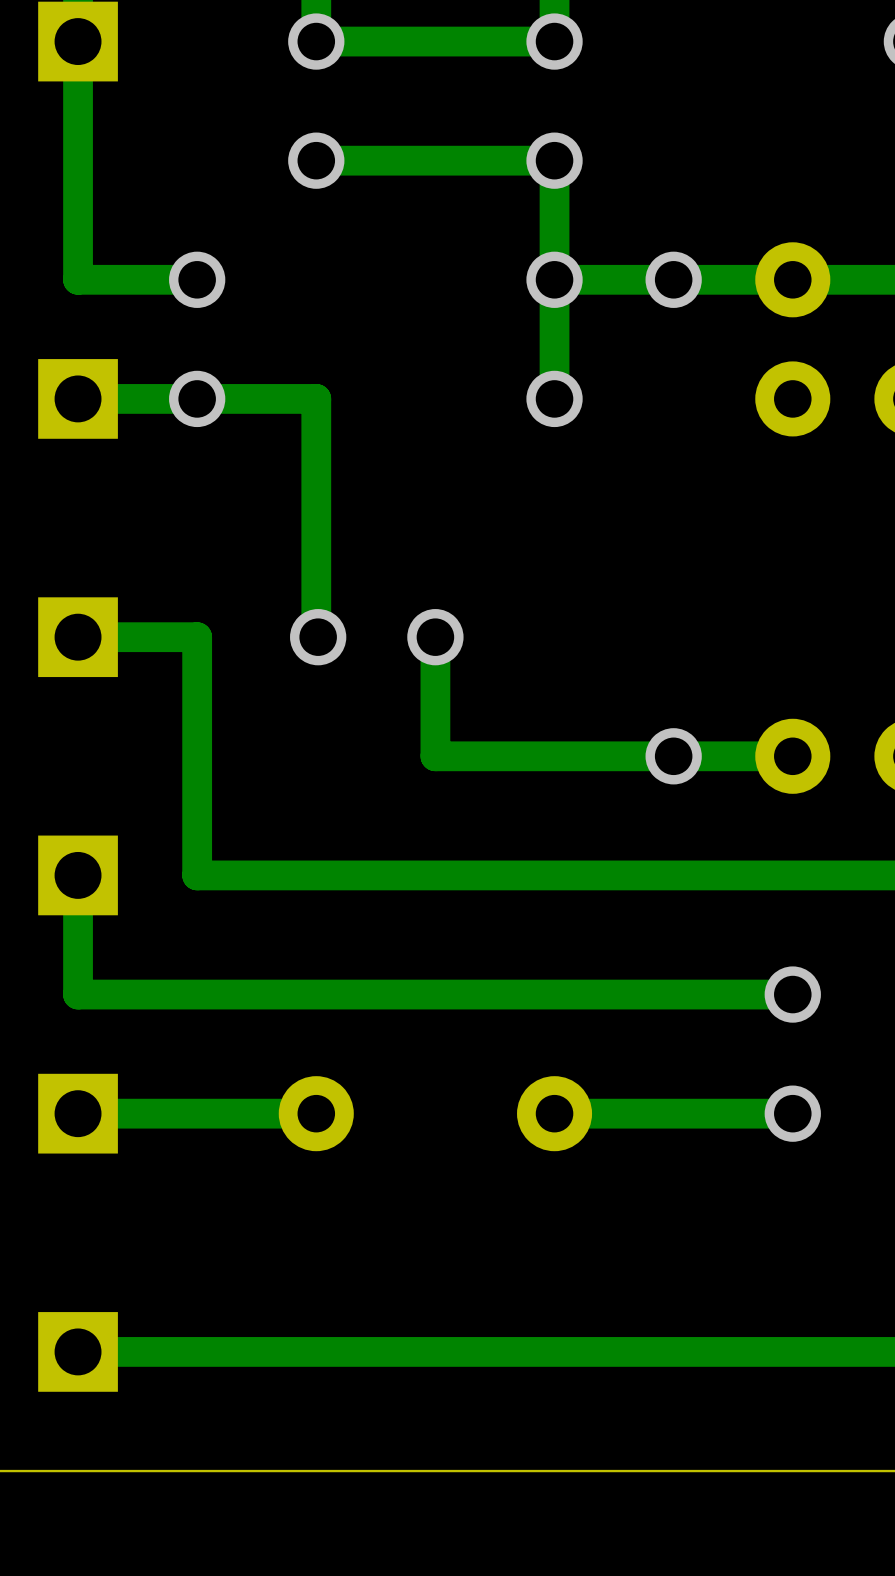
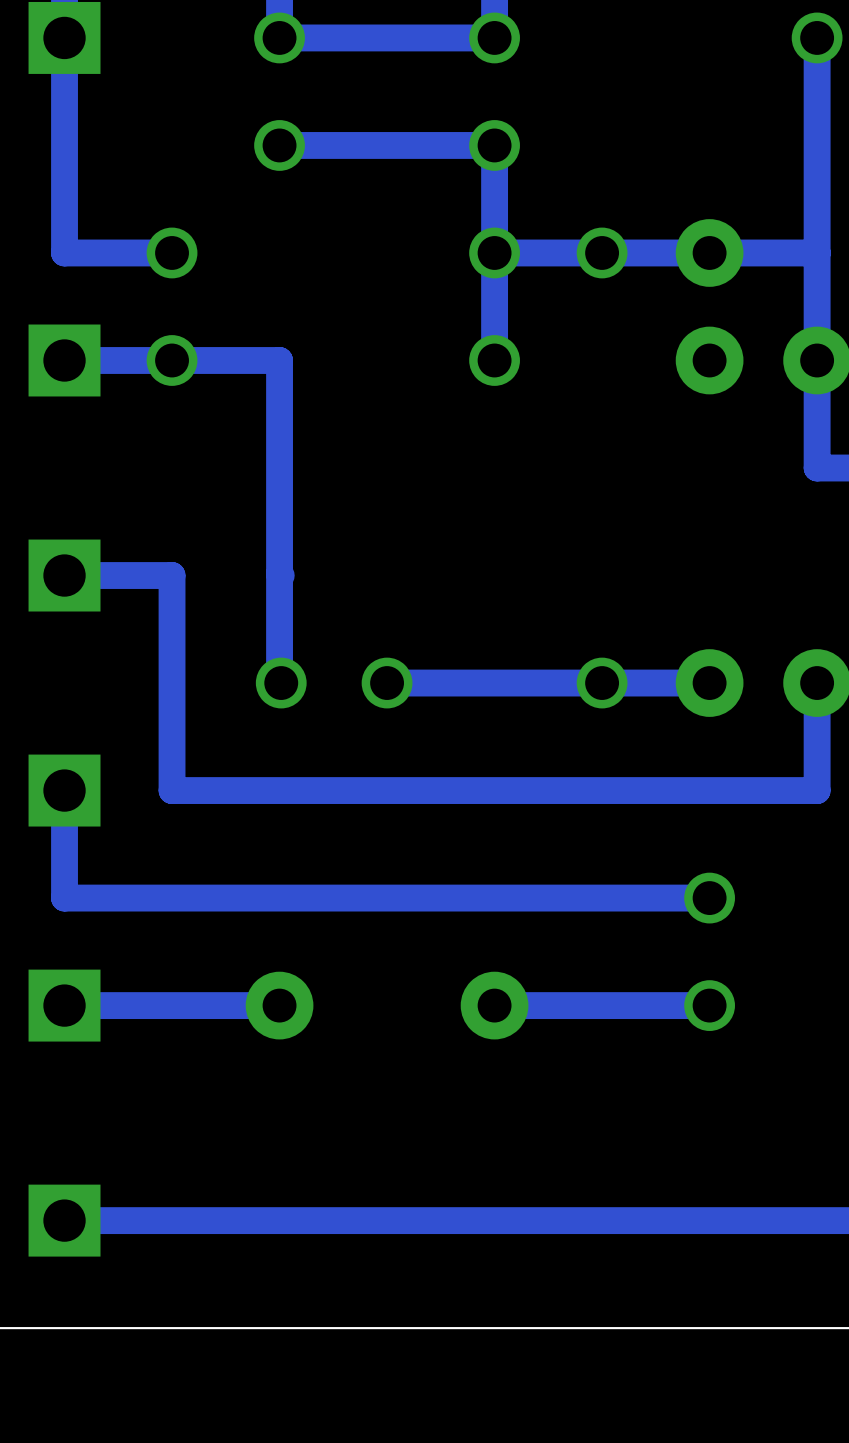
via: (318, 637) -> none
track: (435, 637) (435, 756) -> (279, 575) (279, 683)
via: (435, 637) -> none
via: none -> (281, 683)
via: none -> (387, 683)

